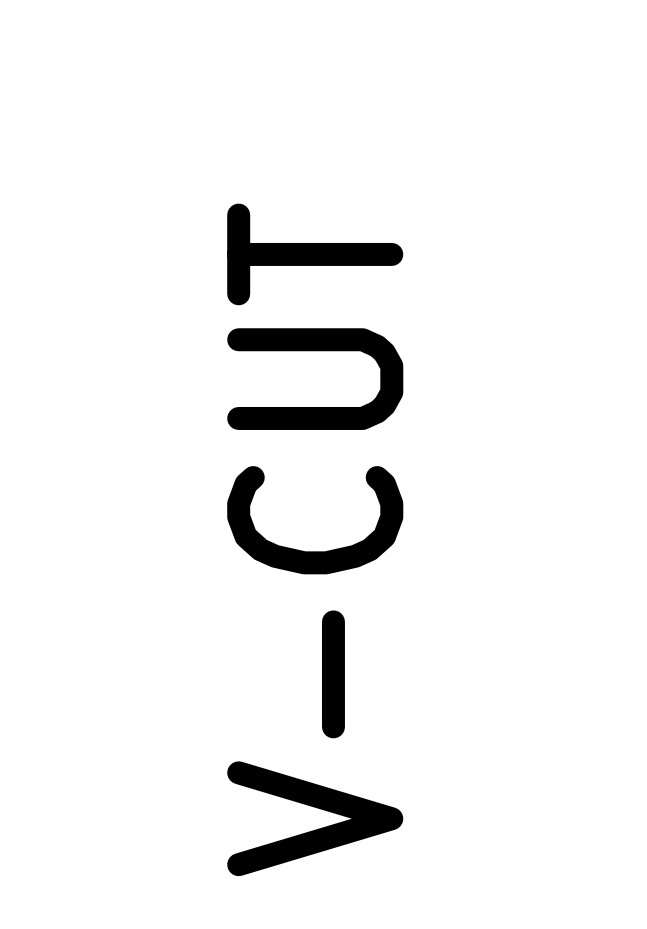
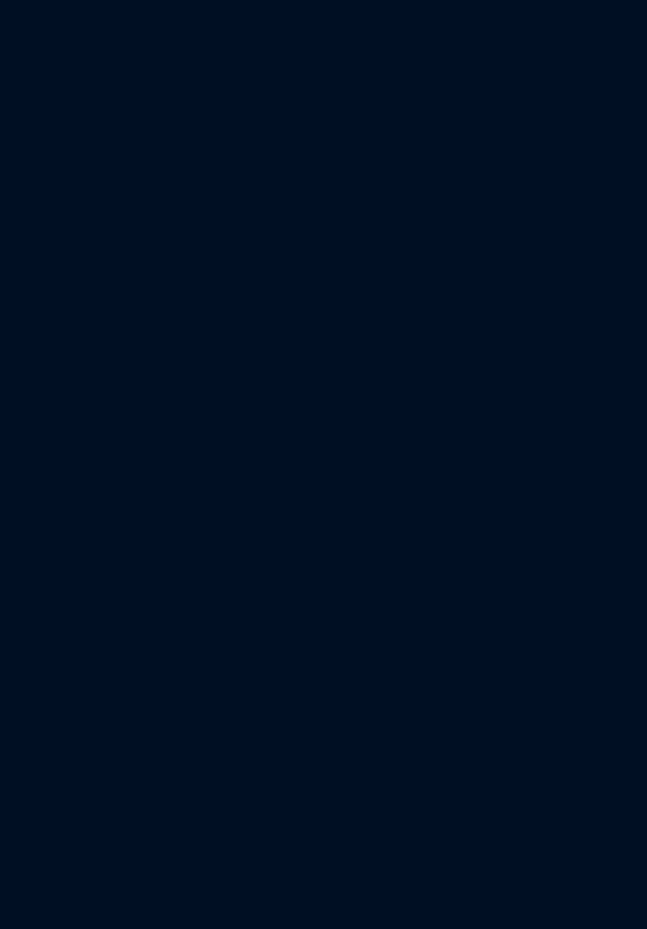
text: V-CUT (315, 539) -> none

